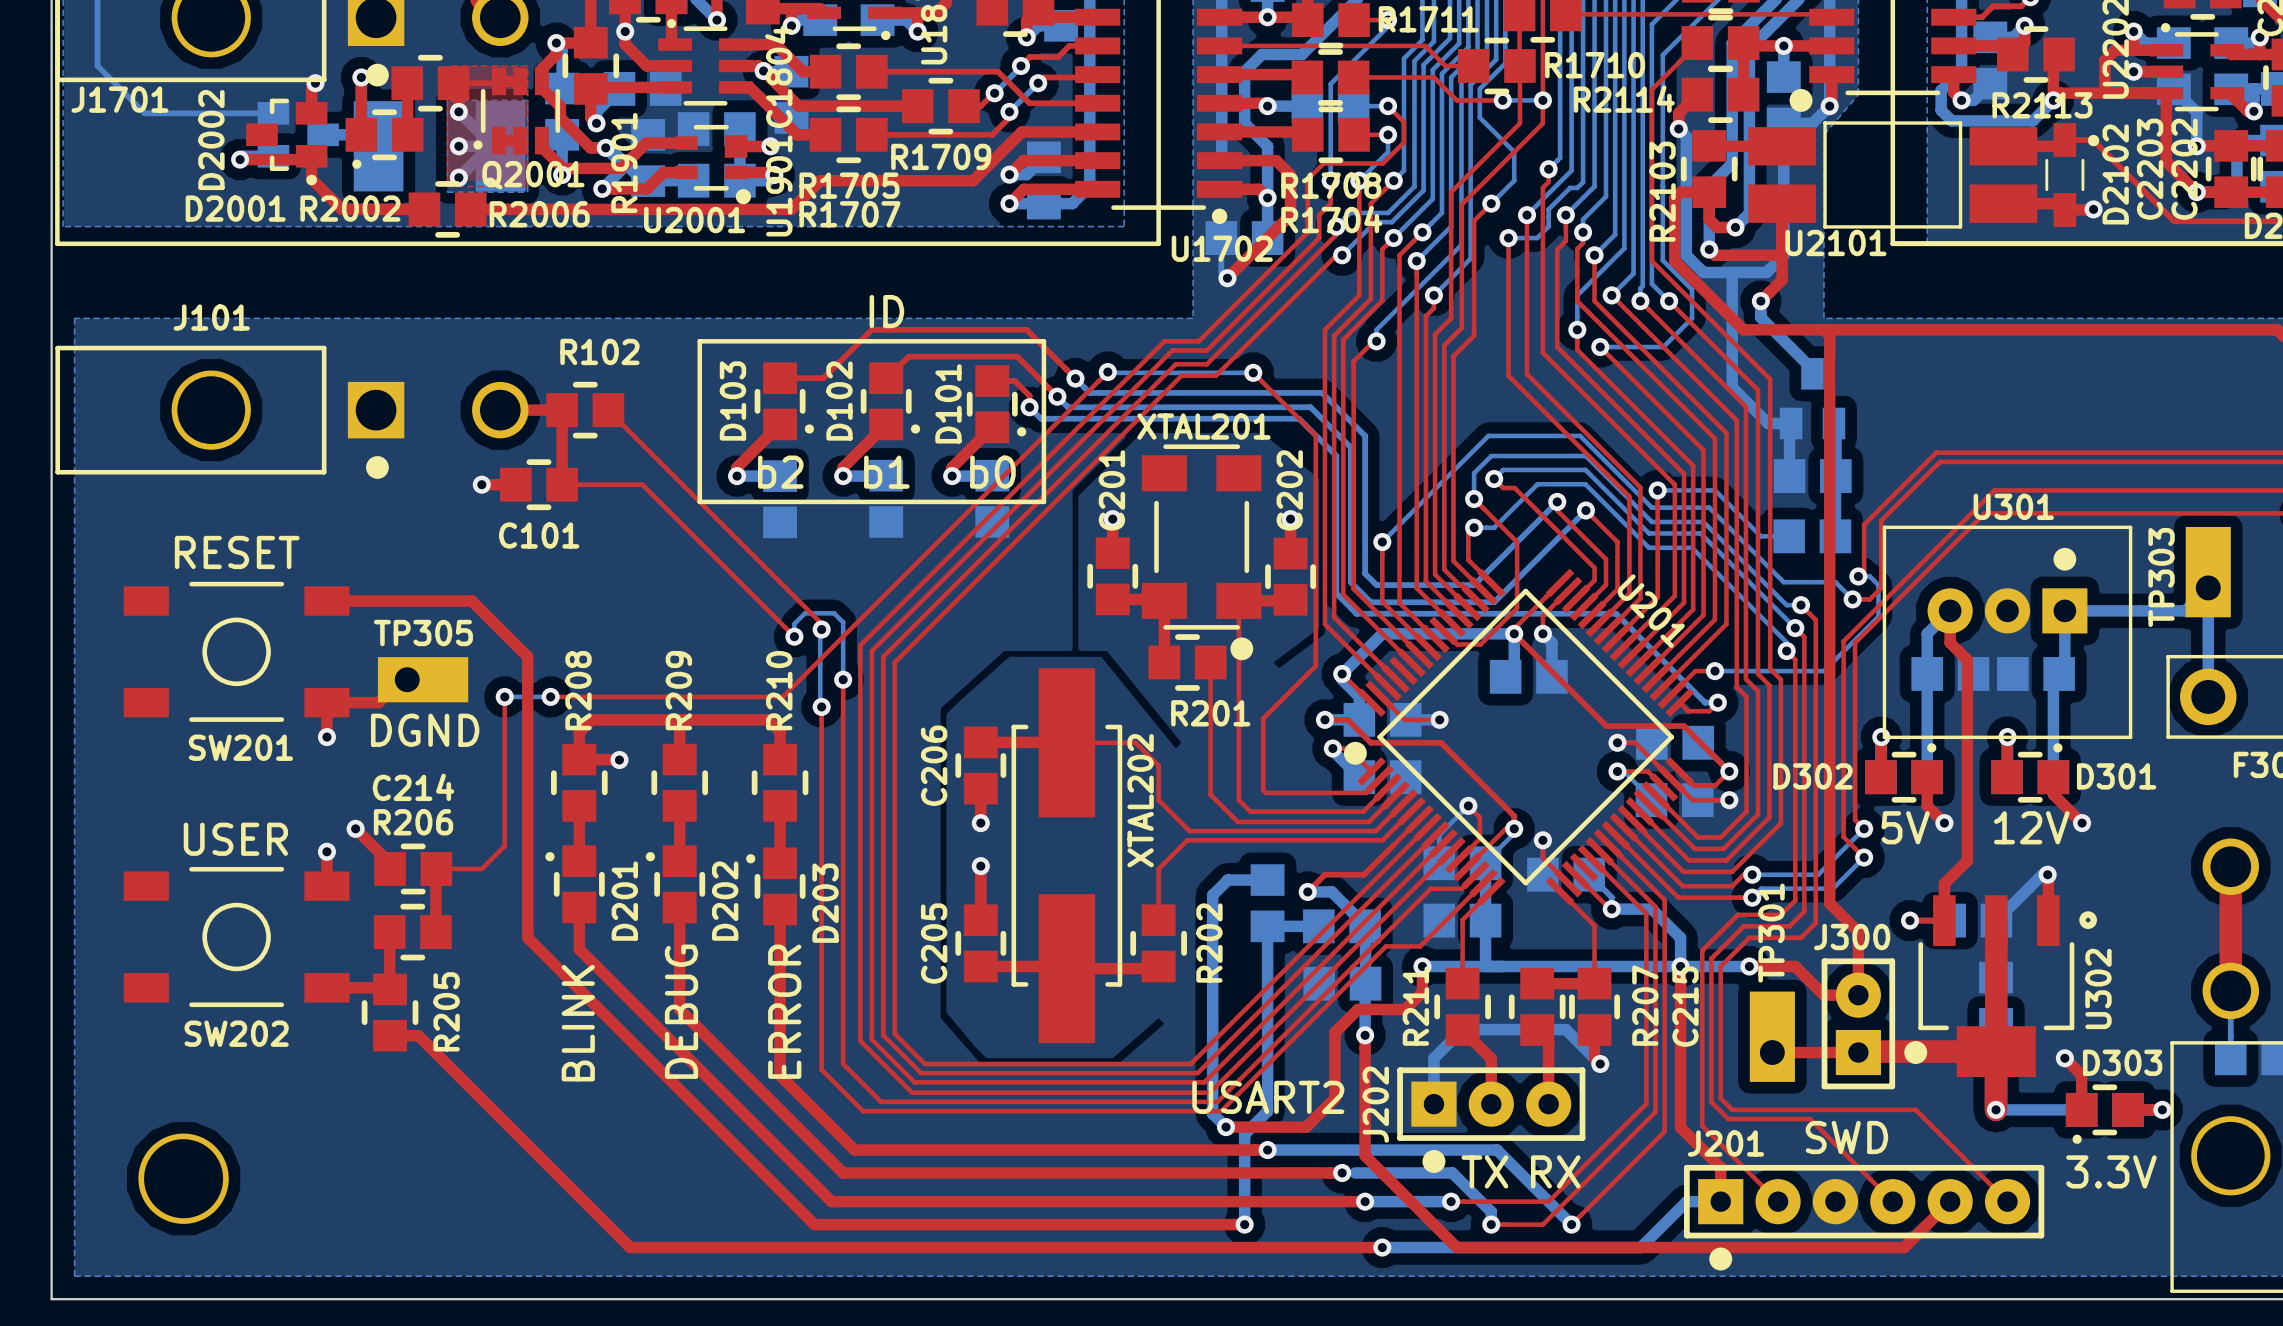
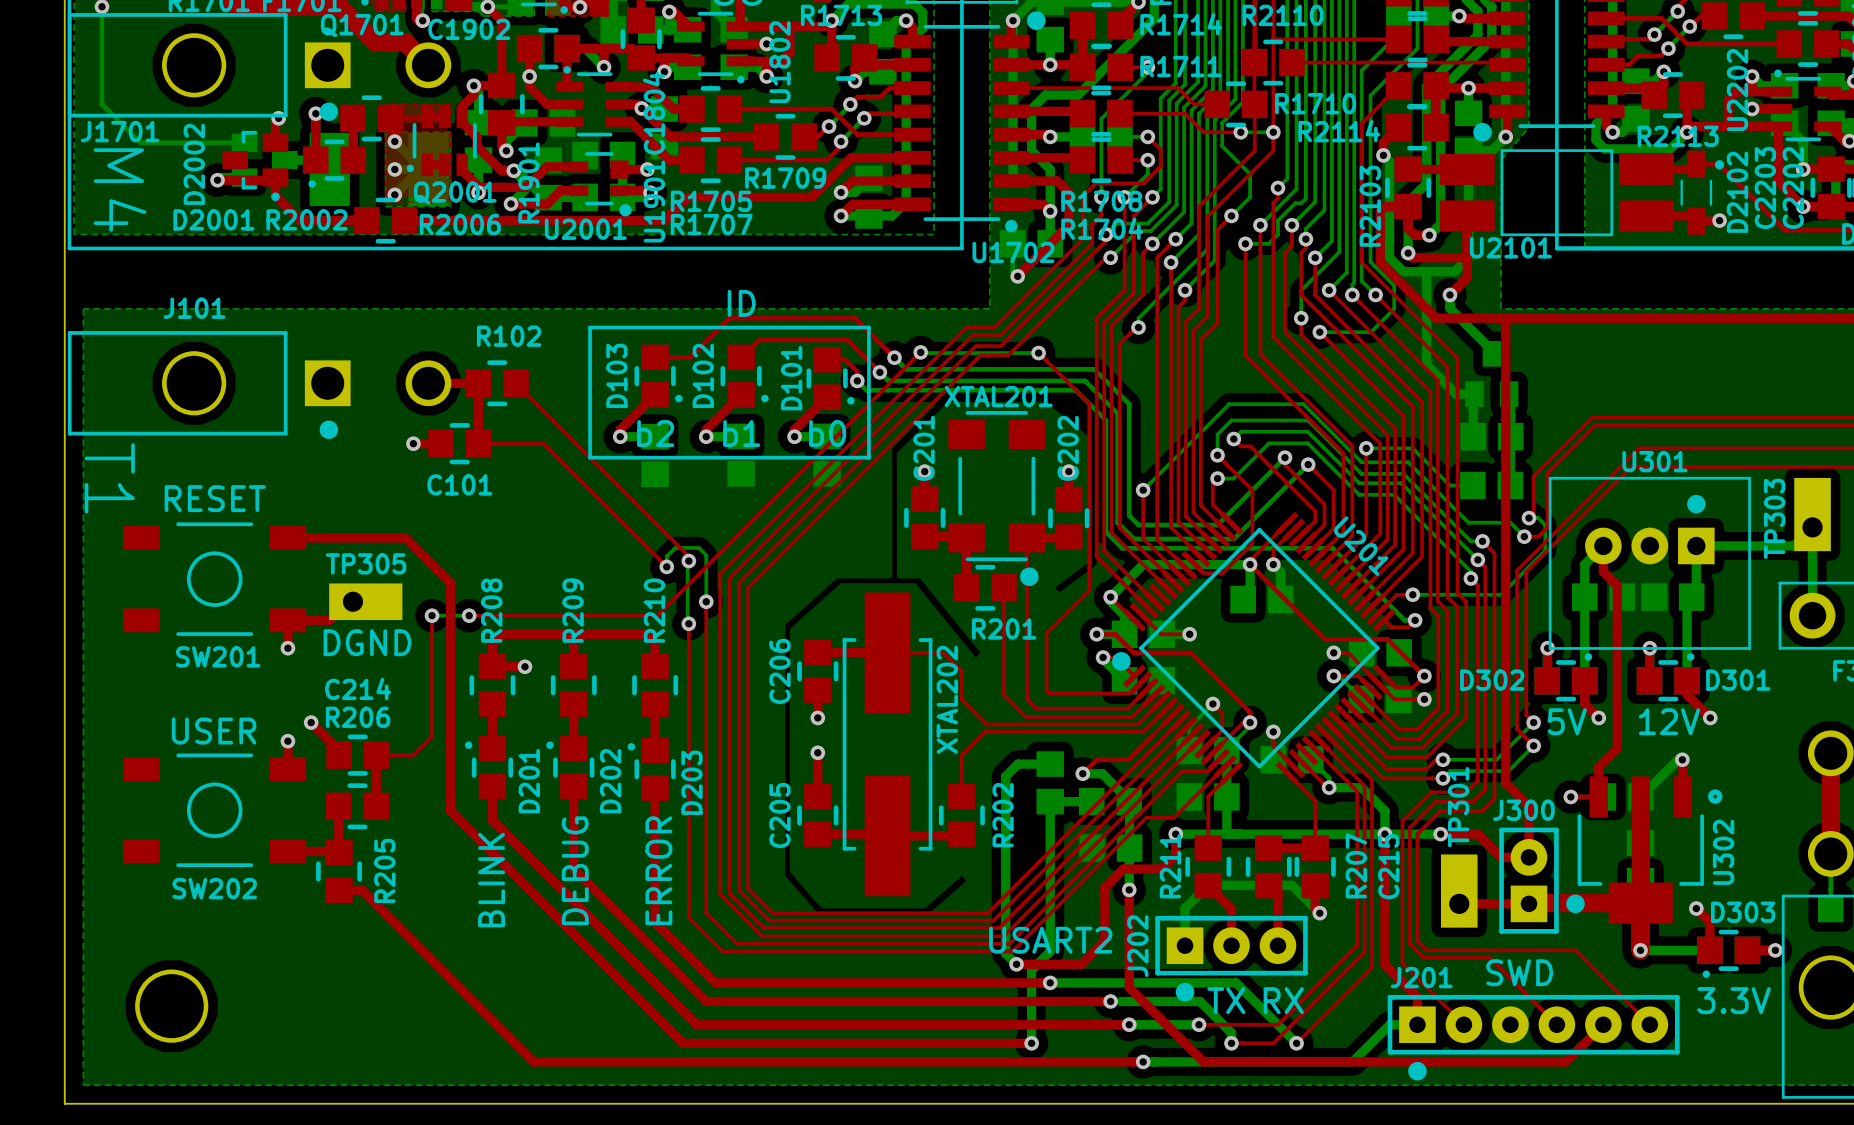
text: none -> M4 (120, 189)
text: none -> T1 (109, 478)

